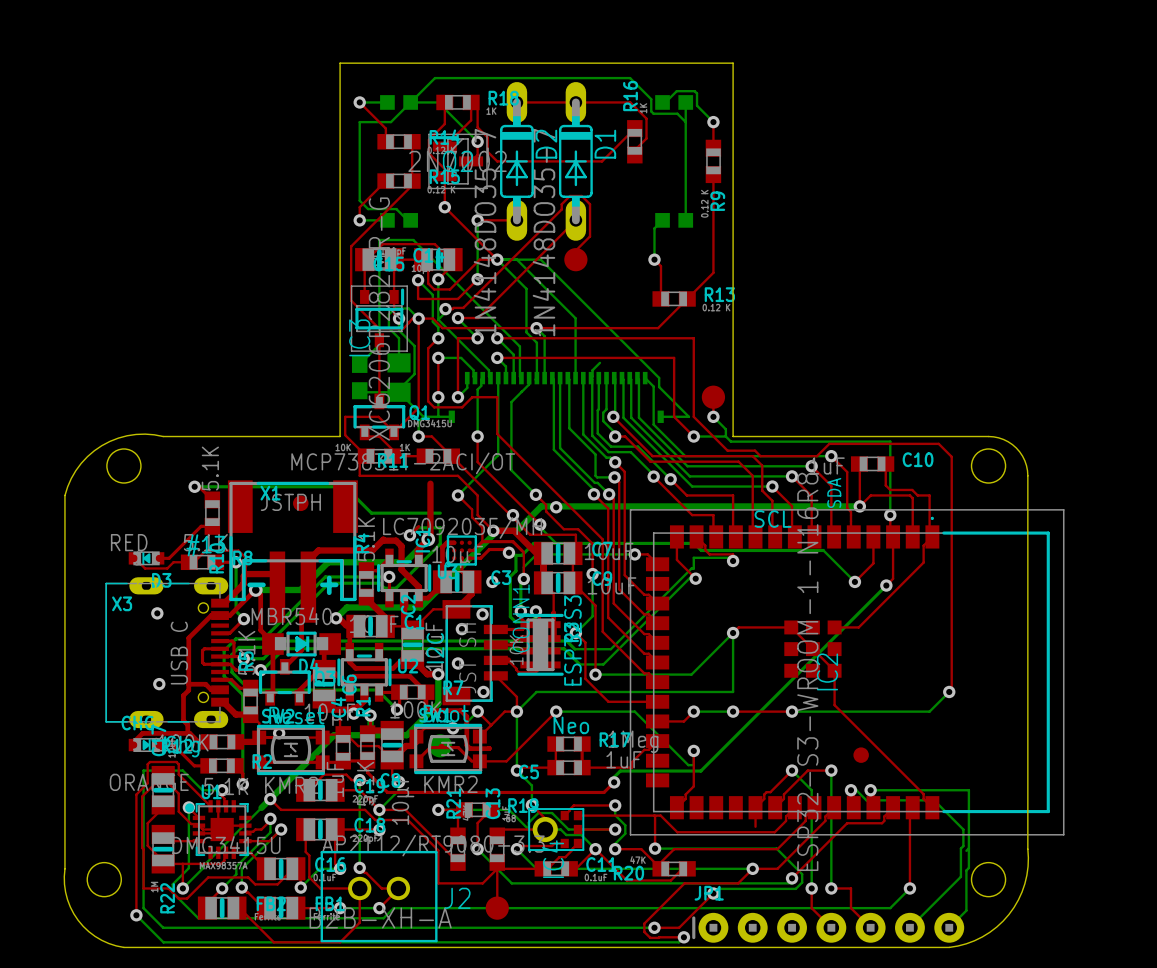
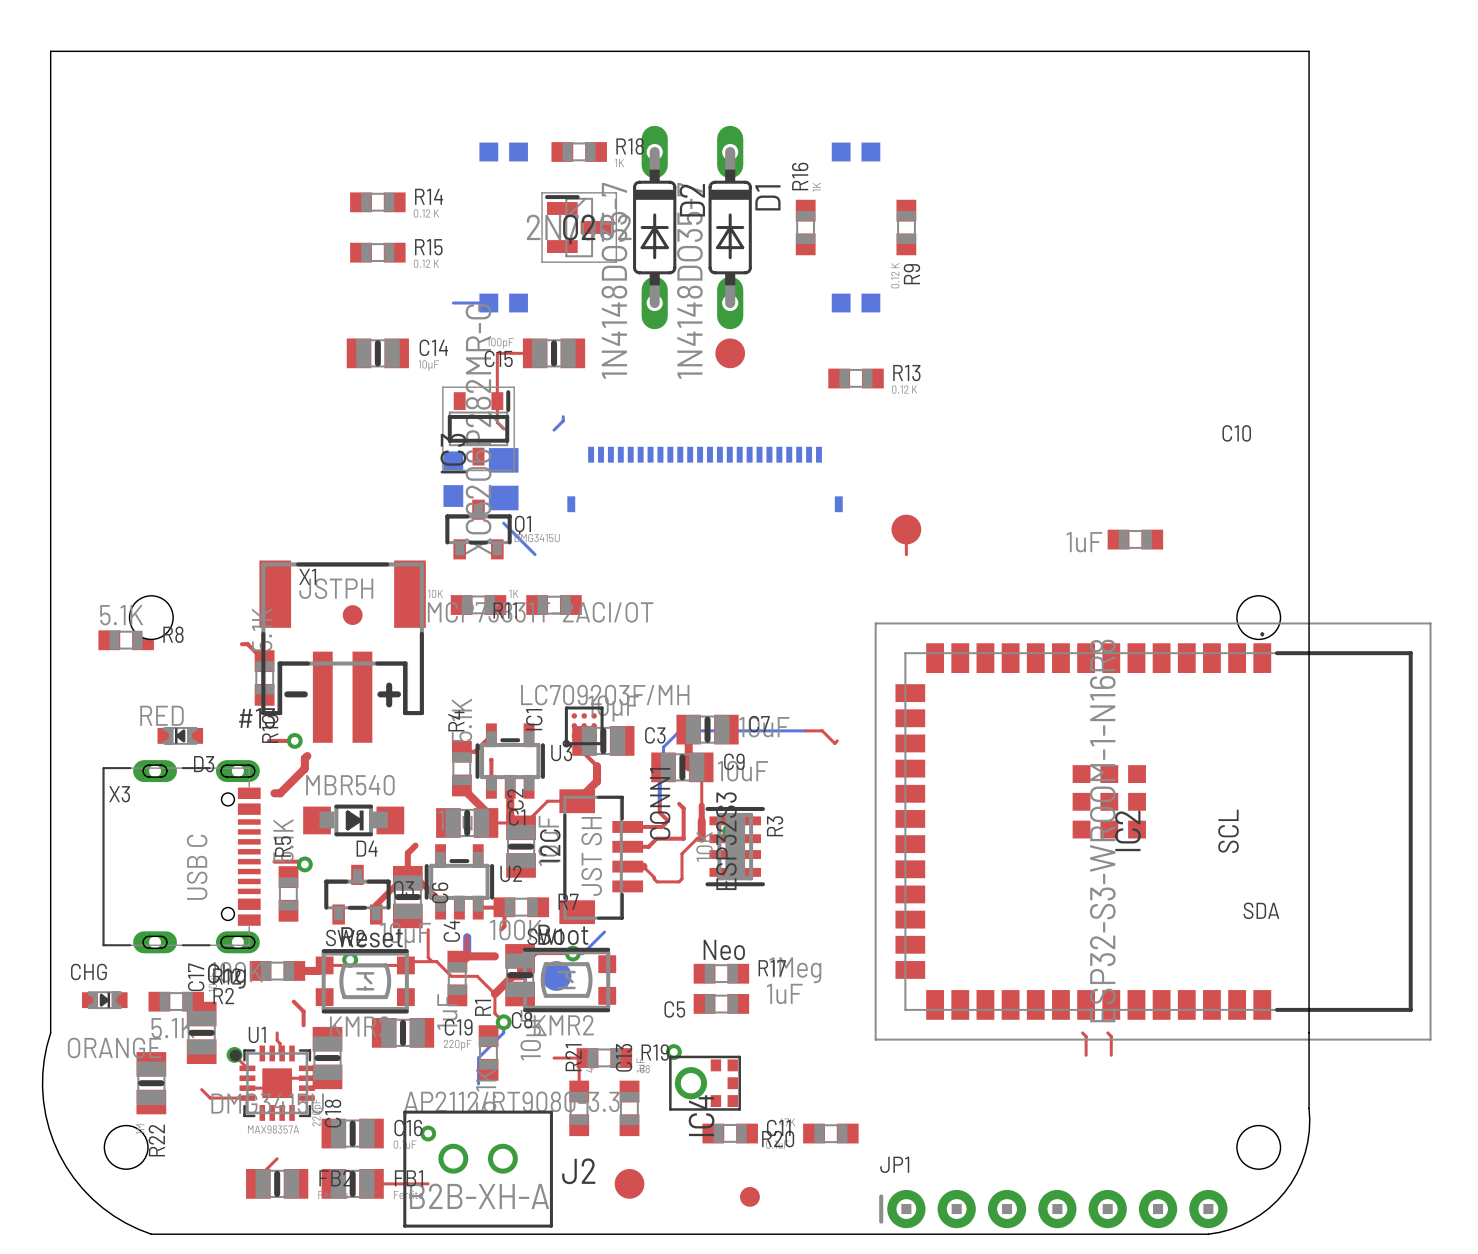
top track: (359, 102) (385, 128) (385, 141) -> none
bottom track: (359, 102) (387, 102) -> none
via: (359, 102) -> none
bottom track: (410, 102) (438, 102) (477, 141) -> none
top track: (516, 102) (630, 102) (646, 118) (646, 138) (634, 150) (634, 154) -> none
bottom track: (662, 102) (665, 102) (676, 91) (694, 91) (697, 93) (697, 105) (713, 122) -> none
bottom track: (685, 102) (685, 220) -> none
top track: (438, 108) (444, 102) (444, 123) (428, 139) (428, 153) (444, 169) (444, 207) (497, 259) (479, 259) (450, 289) (434, 289) (428, 283) (428, 269) (418, 259) -> none
bottom track: (685, 122) (677, 113) (653, 113) (651, 111) (651, 99) (630, 78) (435, 78) (390, 122) (359, 122) (359, 200) (368, 209) (396, 209) (407, 220) (410, 220) -> none
top track: (713, 122) (713, 148) -> none
via: (713, 122) -> none
top track: (634, 128) (602, 161) (497, 161) (487, 151) (487, 137) (477, 127) (477, 102) (471, 102) (471, 120) (444, 146) -> none
R14 position: (399, 141) -> (377, 202)
top track: (412, 141) (412, 185) (351, 246) (351, 300) (379, 328) (403, 328) (412, 318) (432, 318) (442, 328) (658, 328) (713, 272) (713, 174) -> none
top track: (477, 141) (477, 154) (471, 161) -> none
via: (477, 141) -> none
R16 position: (634, 141) -> (805, 227)
top track: (385, 181) (359, 207) (359, 220) -> none
R15 position: (399, 181) -> (377, 252)
via: (444, 207) -> none
via: (359, 220) -> none
top track: (477, 220) (516, 220) -> none
bottom track: (477, 220) (477, 279) -> none
via: (477, 220) -> none
top track: (575, 220) (478, 318) (457, 318) -> none
bottom track: (662, 220) (654, 228) (654, 259) -> none
C14 position: (379, 259) -> (377, 353)
via: (497, 259) -> none
bottom track: (516, 259) (575, 318) (575, 378) -> none
top track: (575, 259) (575, 250) (590, 236) (590, 204) (581, 195) (570, 195) (561, 204) (561, 209) (463, 307) (445, 309) -> none
top track: (654, 259) (660, 266) (660, 298) -> none
via: (654, 259) -> none
top track: (438, 279) (453, 264) (453, 259) (450, 259) (434, 244) (382, 244) (367, 259) (364, 259) (364, 296) -> none
bottom track: (438, 279) (438, 319) (488, 370) (490, 378) -> none
via: (438, 279) -> none
top track: (477, 279) (457, 298) (418, 298) (418, 280) -> none
via: (477, 279) -> none
bottom track: (418, 280) (432, 294) (432, 321) (438, 327) (438, 338) -> none
via: (418, 280) -> none
R13 position: (674, 298) -> (856, 378)
via: (445, 309) -> none
bottom track: (399, 318) (399, 330) (414, 346) (414, 374) (399, 389) (399, 392) (359, 390) -> none
via: (399, 318) -> none
top track: (418, 318) (418, 407) (394, 432) (378, 416) (345, 416) (345, 435) (366, 456) (359, 462) (359, 475) (457, 475) (477, 495) (477, 515) (493, 530) (513, 530) (543, 561) -> none
bottom track: (418, 318) (408, 308) (394, 308) (388, 314) (388, 328) (399, 338) (399, 362) -> none
via: (418, 318) -> none
bottom track: (457, 318) (477, 338) -> none
via: (457, 318) -> none
bottom track: (536, 328) (544, 336) (544, 378) -> none
via: (536, 328) -> none
top track: (438, 338) (428, 348) (428, 401) (434, 407) (462, 407) (472, 397) (497, 397) (497, 433) (602, 539) (602, 631) (644, 673) (648, 673) (657, 682) -> none
via: (438, 338) -> none
top track: (477, 338) (457, 338) (457, 397) -> none
via: (477, 338) -> none
top track: (497, 338) (693, 338) (693, 416) (727, 450) (755, 450) (760, 456) (817, 456) (829, 443) (938, 443) (951, 456) (951, 689) (949, 691) -> none
bottom track: (497, 338) (513, 354) (513, 378) -> none
via: (497, 338) -> none
top track: (379, 340) (379, 401) -> none
top track: (438, 357) (438, 397) -> none
bottom track: (438, 357) (461, 357) (473, 370) (475, 378) -> none
via: (438, 357) -> none
top track: (497, 357) (674, 357) (674, 416) (693, 436) -> none
bottom track: (497, 357) (505, 366) (505, 378) -> none
via: (497, 357) -> none
bottom track: (599, 362) (592, 370) (591, 378) (592, 435) (608, 452) (630, 452) (653, 476) -> none
bottom track: (359, 364) (379, 344) (379, 240) (413, 240) (519, 346) (521, 378) -> none
part position: (359, 377) -> (453, 479)
part position: (399, 377) -> (503, 479)
bottom track: (467, 378) (467, 387) (457, 397) -> none
bottom track: (482, 378) (481, 385) (477, 389) (477, 436) -> none
bottom track: (498, 378) (498, 455) (457, 495) -> none
bottom track: (529, 378) (529, 384) (511, 402) (511, 470) (536, 495) -> none
bottom track: (552, 378) (553, 449) (593, 489) (593, 494) -> none
bottom track: (560, 378) (560, 448) (609, 494) -> none
bottom track: (567, 378) (569, 428) (595, 454) (595, 475) (614, 477) -> none
bottom track: (583, 378) (583, 434) (606, 457) (610, 457) (615, 462) -> none
bottom track: (598, 378) (597, 433) (610, 446) (638, 446) (670, 479) -> none
bottom track: (606, 378) (606, 409) (603, 412) (603, 421) (615, 433) (615, 436) -> none
bottom track: (614, 378) (615, 416) (613, 416) -> none
bottom track: (621, 378) (623, 417) (692, 486) (772, 486) -> none
bottom track: (629, 378) (631, 417) (689, 476) (792, 476) -> none
bottom track: (637, 378) (638, 417) (687, 466) (811, 466) -> none
bottom track: (645, 378) (653, 386) (653, 424) (685, 456) (831, 456) -> none
bottom track: (535, 379) (536, 342) (526, 332) (526, 288) (497, 259) (540, 259) (659, 377) (659, 387) (688, 416) (660, 416) -> none
bottom track: (438, 397) (438, 416) -> none
via: (438, 397) -> none
via: (457, 397) -> none
part position: (556, 397) -> (705, 479)
Q1 position: (379, 416) -> (478, 529)
bottom track: (451, 416) (423, 416) (418, 421) (418, 436) -> none
top track: (613, 416) (652, 456) (752, 456) (762, 465) (762, 490) (772, 500) (772, 534) (775, 536) -> none
via: (613, 416) -> none
bottom track: (713, 416) (725, 429) (725, 436) -> none
via: (713, 416) -> none
top track: (364, 432) (368, 436) (379, 436) (392, 449) (392, 456) (425, 456) -> none
top track: (418, 436) (431, 436) (530, 534) (575, 534) (575, 551) (572, 554) -> none
via: (418, 436) -> none
top track: (477, 436) (477, 462) (540, 524) -> none
via: (477, 436) -> none
top track: (615, 436) (625, 436) (650, 461) (738, 461) (752, 475) (752, 534) (755, 536) -> none
via: (615, 436) -> none
bottom track: (693, 436) (725, 436) -> none
via: (693, 436) -> none
bottom track: (725, 436) (730, 441) (890, 441) (890, 515) -> none
top track: (831, 456) (847, 472) (847, 508) (850, 511) (850, 534) (853, 536) -> none
via: (831, 456) -> none
C10 name position: C10 (918, 459) -> C10 (1236, 433)
top track: (615, 462) (624, 471) (624, 575) (644, 594) (648, 594) (657, 603) -> none
via: (615, 462) -> none
top track: (859, 464) (859, 506) -> none
C10 position: (872, 464) -> (1135, 539)
top track: (885, 464) (885, 485) (890, 489) (912, 489) (917, 495) (929, 495) (929, 534) (932, 536) (923, 545) (923, 562) (858, 627) (834, 627) -> none
top track: (811, 466) (831, 485) (831, 534) (834, 536) -> none
via: (811, 466) -> none
board edge: (1027, 475) (1024, 460) (1016, 448) (1003, 439) (993, 436) (733, 436) (733, 63) (340, 63) (340, 436) (163, 436) (145, 434) (127, 435) (101, 445) (87, 456) (75, 470) (64, 495) (64, 884) (70, 906) (83, 926) (101, 940) (123, 947) -> (1309, 630) (1309, 51) (50, 51) (50, 1032) (42, 1073) (43, 1101) (53, 1141) (73, 1178) (92, 1198) (113, 1216) (151, 1234)
top track: (653, 476) (692, 515) (713, 515) (713, 534) (716, 536) -> none
via: (653, 476) -> none
top track: (792, 476) (811, 496) (811, 534) (814, 536) -> none
via: (792, 476) -> none
top track: (614, 477) (619, 482) (619, 589) (644, 614) (648, 614) (657, 623) -> none
via: (614, 477) -> none
top track: (670, 479) (686, 495) (733, 495) (733, 534) (735, 536) -> none
via: (670, 479) -> none
top track: (430, 483) (430, 537) (418, 548) (418, 557) -> none
bottom track: (194, 486) (345, 486) (371, 513) (440, 513) -> none
via: (194, 486) -> none
top track: (772, 486) (792, 506) (792, 534) (794, 536) -> none
via: (772, 486) -> none
text rotation: 0° (834, 492) -> 90° clockwise (1261, 910)
text position: SDA (834, 492) -> SDA (1261, 910)
top track: (535, 494) (546, 505) (546, 511) (563, 529) (578, 529) (592, 543) (592, 574) -> none
via: (535, 494) -> none
top track: (593, 494) (608, 508) (608, 617) (644, 653) (648, 653) (657, 662) -> none
via: (593, 494) -> none
top track: (609, 494) (613, 498) (613, 603) (644, 634) (648, 634) (657, 642) -> none
via: (609, 494) -> none
top track: (457, 495) (472, 509) (472, 517) (482, 527) (482, 541) -> none
via: (457, 495) -> none
part position: (300, 503) -> (352, 615)
top track: (859, 506) (870, 495) (909, 495) (912, 498) (912, 536) -> none
bottom track: (859, 506) (541, 506) (516, 530) (493, 530) (493, 534) (420, 607) (346, 607) (336, 618) -> none
via: (859, 506) -> none
via: (556, 507) -> none
via: (513, 515) -> none
top track: (890, 515) (890, 534) (893, 536) (893, 578) (886, 585) -> none
via: (890, 515) -> none
text rotation: 0° (773, 519) -> 90° counterclockwise (1228, 831)
text position: SCL (773, 519) -> SCL (1228, 831)
bottom track: (540, 524) (540, 527) (556, 543) -> none
via: (540, 524) -> none
top track: (212, 526) (201, 526) (169, 558) (158, 558) -> none
top track: (418, 526) (409, 535) -> none
via: (493, 530) -> none
bottom track: (409, 535) (417, 527) (440, 527) (440, 544) (396, 588) (384, 588) (379, 583) (328, 583) (264, 647) (239, 647) (232, 654) (232, 672) (249, 690) (377, 690) (397, 709) -> none
via: (409, 535) -> none
top track: (676, 536) (676, 559) (695, 578) -> none
top track: (873, 536) (873, 563) (854, 581) -> none
bottom track: (428, 539) (405, 562) (328, 562) (300, 589) (255, 589) -> none
via: (428, 539) -> none
top track: (482, 541) (473, 550) (469, 550) -> none
top track: (482, 541) (512, 541) (523, 552) (523, 578) -> none
top track: (692, 541) (696, 536) (705, 545) (705, 550) (709, 554) (733, 554) (733, 561) -> none
top track: (454, 542) (447, 542) (442, 547) (442, 585) (428, 598) (418, 598) (418, 587) (401, 569) (401, 546) (396, 540) (383, 539) (372, 550) (318, 550) (308, 560) (306, 607) (301, 612) (301, 650) (284, 666) -> none
X1 position: (292, 551) -> (342, 651)
top track: (508, 552) (505, 549) (489, 549) (480, 558) (469, 558) -> none
bottom track: (508, 552) (512, 555) (521, 555) (533, 543) (694, 543) (701, 550) (823, 550) (854, 581) -> none
via: (508, 552) -> none
top track: (572, 553) (572, 582) (595, 605) (595, 674) -> none
via: (634, 554) -> none
bottom track: (515, 555) (515, 570) (510, 576) (510, 616) (515, 621) (531, 621) (535, 617) (535, 611) -> none
top track: (134, 558) (145, 568) (167, 568) (173, 562) (194, 562) (205, 550) (238, 550) (246, 558) (245, 574) (273, 574) (277, 578) (277, 587) -> none
bottom track: (733, 561) (729, 557) (693, 557) (693, 568) (691, 568) (610, 649) (574, 649) (566, 641) (281, 641) (263, 658) (243, 658) -> none
via: (733, 561) -> none
R8 position: (202, 562) -> (126, 640)
bottom track: (236, 562) (236, 611) (243, 619) -> none
bottom track: (592, 574) (592, 616) (575, 633) -> none
via: (592, 574) -> none
bottom track: (389, 576) (325, 576) (263, 638) (235, 638) (224, 650) (224, 676) (242, 694) (242, 784) -> none
via: (389, 576) -> none
via: (523, 578) -> none
bottom track: (695, 578) (693, 574) (603, 664) (579, 664) (564, 648) (284, 648) (260, 670) -> none
via: (695, 578) -> none
C3 position: (457, 581) -> (603, 740)
via: (492, 581) -> none
via: (854, 581) -> none
C9 position: (558, 582) -> (682, 767)
bottom track: (886, 585) (700, 771) (620, 771) (614, 777) (614, 782) -> none
via: (886, 585) -> none
via: (255, 589) -> none
via: (520, 611) -> none
via: (535, 611) -> none
via: (157, 613) -> none
via: (482, 614) -> none
top track: (336, 618) (339, 618) (346, 625) (355, 626) (349, 632) (349, 662) (355, 668) (393, 668) (402, 659) (412, 659) (427, 674) (438, 674) -> none
via: (336, 618) -> none
top track: (243, 619) (229, 633) (220, 633) -> none
via: (243, 619) -> none
via: (461, 629) -> none
top track: (575, 633) (585, 642) (585, 678) (608, 701) (657, 701) -> none
top track: (733, 633) (738, 627) (791, 627) (834, 670) (834, 705) (923, 794) (923, 798) (932, 807) -> none
via: (733, 633) -> none
top track: (220, 641) (232, 641) (233, 642) (233, 656) -> none
D4 position: (301, 644) -> (353, 820)
R3 position: (540, 644) -> (735, 846)
top track: (220, 648) (204, 648) (202, 650) (202, 662) (204, 664) (230, 664) (236, 670) (260, 670) -> none
X3 position: (167, 652) -> (181, 856)
via: (457, 663) -> none
via: (260, 670) -> none
IC2 position: (847, 672) -> (1153, 831)
bottom track: (438, 674) (438, 703) (406, 735) (334, 735) (182, 888) -> none
via: (438, 674) -> none
bottom track: (595, 674) (691, 674) (733, 633) (733, 691) (536, 691) (516, 711) (516, 770) (531, 785) (531, 805) -> none
via: (595, 674) -> none
top track: (495, 675) (516, 696) (516, 711) (504, 711) (479, 736) -> none
top track: (220, 679) (231, 679) (240, 688) (250, 688) -> none
via: (159, 684) -> none
top track: (188, 684) (205, 684) (211, 689) (220, 689) -> none
via: (483, 691) -> none
bottom track: (949, 691) (929, 711) (792, 711) -> none
via: (949, 691) -> none
top track: (364, 692) (364, 700) (357, 707) (351, 709) (324, 709) (324, 698) -> none
top track: (425, 692) (409, 676) (353, 676) (349, 680) (349, 692) -> none
top track: (425, 692) (425, 706) (430, 710) (460, 710) (466, 716) (466, 745) (470, 748) (488, 748) -> none
top track: (270, 697) (272, 695) (272, 642) (260, 630) (260, 594) (255, 589) (229, 615) (211, 615) (188, 638) (188, 690) (183, 695) (183, 720) (187, 724) (187, 733) -> none
R5 position: (250, 701) -> (288, 893)
top track: (220, 702) (223, 702) (235, 714) (250, 714) (259, 723) (259, 737) -> none
via: (397, 709) -> none
top track: (477, 711) (491, 725) -> none
via: (477, 711) -> none
via: (516, 711) -> none
top track: (556, 711) (506, 761) (479, 761) -> none
bottom track: (556, 711) (634, 711) (688, 765) (693, 765) (693, 750) -> none
via: (556, 711) -> none
top track: (693, 711) (683, 721) (657, 721) -> none
bottom track: (693, 711) (733, 711) -> none
via: (693, 711) -> none
top track: (733, 711) (792, 711) -> none
via: (733, 711) -> none
via: (792, 711) -> none
via: (353, 713) -> none
via: (370, 715) -> none
top track: (209, 741) (198, 741) (189, 733) (142, 733) (134, 741) (134, 745) -> none
top track: (657, 741) (648, 749) (644, 749) (631, 762) (631, 767) (582, 767) (582, 744) -> none
top track: (555, 744) (555, 767) (519, 767) (516, 770) -> none
CHG position: (146, 745) -> (104, 1000)
top track: (158, 745) (173, 745) (194, 765) (208, 765) -> none
C8 position: (392, 745) -> (520, 975)
top track: (440, 745) (444, 747) -> none
C4 position: (343, 747) -> (457, 978)
R1 position: (367, 747) -> (488, 1053)
top track: (693, 750) (693, 786) (676, 807) -> none
via: (693, 750) -> none
part: (861, 755) -> none
top track: (416, 761) (430, 747) (458, 747) (472, 761) -> none
top track: (259, 762) (341, 762) (367, 760) (367, 772) (387, 792) (604, 792) (614, 782) -> none
R2 position: (221, 765) -> (176, 1001)
via: (516, 770) -> none
top track: (792, 770) (770, 792) (764, 794) (764, 798) (755, 807) (755, 826) -> none
bottom track: (792, 770) (811, 790) (811, 888) -> none
via: (792, 770) -> none
top track: (831, 770) (807, 770) (783, 794) (783, 798) (772, 810) -> none
bottom track: (831, 770) (831, 888) -> none
via: (831, 770) -> none
top track: (359, 780) (351, 780) (346, 774) (323, 774) (308, 790) (305, 790) -> none
bottom track: (359, 780) (359, 867) -> none
via: (359, 780) -> none
via: (614, 782) -> none
via: (242, 784) -> none
bottom track: (222, 790) (202, 790) (182, 770) (143, 770) (143, 908) (163, 927) (654, 927) -> none
via: (222, 790) -> none
top track: (335, 790) (359, 790) (379, 809) (405, 809) (457, 862) -> none
bottom track: (850, 790) (856, 790) (866, 800) (934, 800) (963, 829) (960, 876) (909, 927) -> none
via: (850, 790) -> none
bottom track: (870, 790) (968, 790) (968, 867) (966, 870) (966, 910) (949, 927) -> none
via: (870, 790) -> none
top track: (270, 799) (281, 809) (365, 809) (375, 820) (407, 820) (438, 850) (438, 883) (482, 883) (500, 865) -> none
via: (270, 799) -> none
top track: (163, 804) (163, 807) (147, 823) (147, 845) (163, 861) (163, 863) (221, 863) (224, 860) (226, 852) (250, 852) (266, 868) -> none
top track: (531, 805) (545, 818) (545, 829) (503, 829) (497, 836) -> none
top track: (615, 805) (573, 805) (564, 815) -> none
bottom track: (615, 805) (615, 815) (625, 825) (625, 833) (615, 843) (615, 849) -> none
via: (615, 805) -> none
top track: (210, 806) (178, 774) (178, 764) (176, 762) (149, 762) (147, 764) (147, 783) (136, 794) (136, 915) -> none
top track: (218, 806) (218, 825) (222, 829) (202, 829) (197, 824) (191, 824) (178, 811) (178, 793) (163, 778) (163, 775) (142, 796) (143, 888) (168, 888) (178, 898) (187, 898) (208, 877) (248, 877) (255, 884) (277, 884) (293, 868) (300, 873) (300, 887) -> none
bottom track: (188, 807) (188, 868) (172, 884) (172, 892) (198, 918) (383, 918) (393, 908) (890, 908) (909, 888) -> none
top track: (794, 807) (786, 816) (786, 820) (774, 832) (677, 832) (660, 815) (577, 815) -> none
top track: (814, 807) (805, 816) (805, 820) (777, 849) (674, 849) (657, 865) -> none
top track: (834, 807) (825, 816) (825, 820) (777, 868) (752, 868) (738, 883) (684, 883) (644, 923) (644, 931) (650, 937) (683, 937) -> none
top track: (893, 807) (884, 816) (882, 823) (847, 823) (792, 878) -> none
top track: (912, 807) (909, 810) (909, 888) -> none
via: (379, 809) -> none
bottom track: (438, 809) (509, 809) (528, 829) (528, 822) (538, 813) (552, 813) (568, 829) (615, 829) -> none
via: (438, 809) -> none
top track: (490, 809) (477, 823) (477, 849) -> none
top track: (654, 815) (655, 848) -> none
top track: (270, 818) (261, 829) (245, 833) -> none
bottom track: (270, 818) (270, 832) (236, 866) (236, 874) (222, 888) -> none
via: (270, 818) -> none
top track: (281, 829) (269, 841) (245, 841) -> none
bottom track: (281, 829) (241, 868) (241, 888) -> none
via: (281, 829) -> none
top track: (305, 829) (305, 851) (309, 855) (309, 877) (320, 888) (359, 888) (359, 922) (340, 942) (273, 942) (239, 908) (236, 908) -> none
C18 rotation: 0° (320, 829) -> 90° clockwise (327, 1058)
C18 position: (320, 829) -> (327, 1058)
bottom track: (545, 829) (560, 829) (566, 835) (581, 835) (595, 849) -> none
top track: (577, 829) (615, 829) -> none
via: (615, 829) -> none
top track: (379, 830) (335, 829) (335, 863) (340, 868) -> none
via: (379, 830) -> none
top track: (564, 843) (554, 843) (552, 846) (520, 846) (516, 849) -> none
top track: (577, 843) (565, 857) (559, 857) (547, 868) (503, 868) (497, 862) (497, 908) -> none
bottom track: (655, 848) (776, 848) (802, 874) (802, 882) (795, 888) (718, 888) (713, 893) -> none
via: (655, 848) -> none
bottom track: (968, 848) (966, 850) -> none
R22 position: (163, 849) -> (151, 1083)
bottom track: (477, 849) (511, 883) (792, 883) (792, 878) -> none
via: (477, 849) -> none
bottom track: (516, 849) (536, 868) (752, 868) -> none
via: (516, 849) -> none
via: (595, 849) -> none
top track: (615, 849) (641, 849) (660, 868) -> none
via: (615, 849) -> none
top track: (182, 863) (182, 888) -> none
top track: (359, 867) (381, 888) (398, 888) (379, 908) -> none
via: (359, 867) -> none
bottom track: (340, 868) (319, 868) (300, 887) -> none
C11 position: (556, 868) -> (730, 1133)
top track: (569, 868) (575, 868) (595, 849) (626, 880) (670, 880) (682, 868) (687, 868) -> none
R20 position: (674, 868) -> (830, 1133)
via: (752, 868) -> none
via: (792, 878) -> none
top track: (241, 887) (263, 908) (266, 908) -> none
via: (241, 887) -> none
via: (300, 887) -> none
via: (182, 888) -> none
via: (222, 888) -> none
top track: (811, 888) (811, 908) (831, 927) -> none
via: (811, 888) -> none
top track: (831, 888) (850, 888) (850, 908) (870, 927) -> none
via: (831, 888) -> none
via: (909, 888) -> none
top track: (713, 893) (679, 927) (654, 927) -> none
via: (713, 893) -> none
bottom track: (340, 908) (379, 908) -> none
via: (340, 908) -> none
via: (379, 908) -> none
bottom track: (136, 915) (163, 942) -> none
via: (136, 915) -> none
part: none -> (749, 1196)
via: (654, 927) -> none
bottom track: (683, 937) (678, 942) (163, 942) -> none
via: (683, 937) -> none

